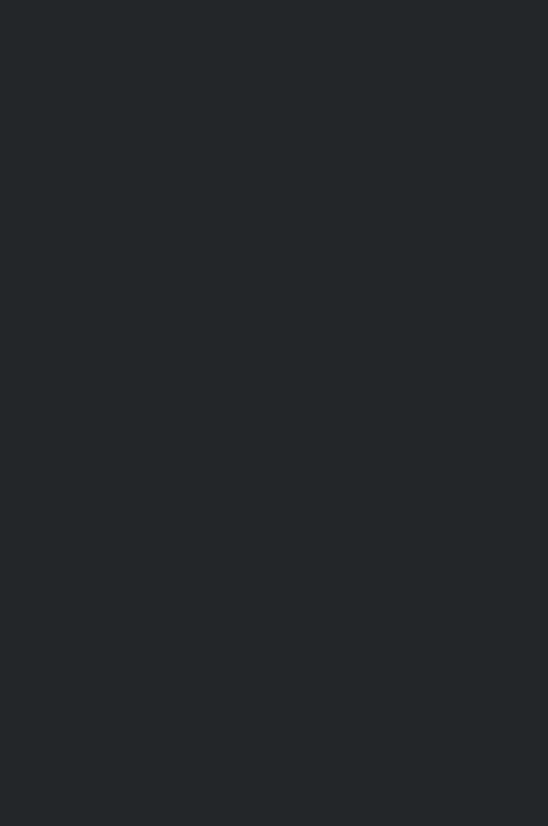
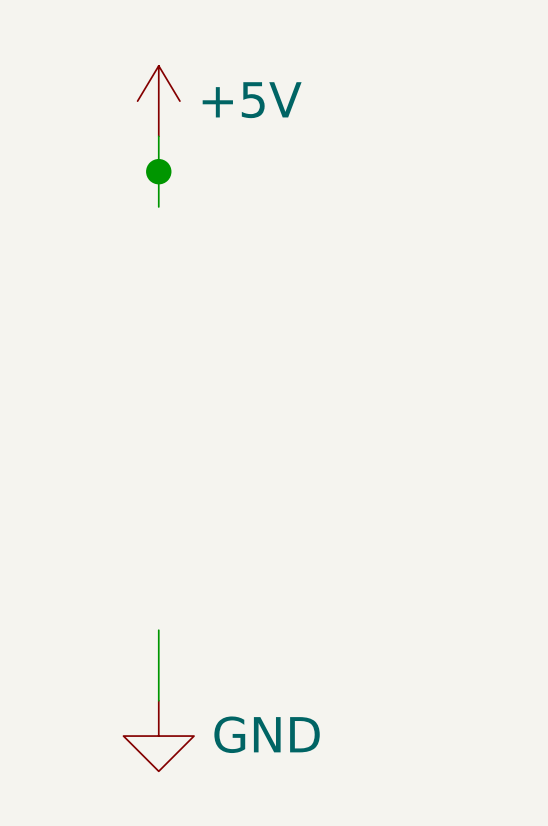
power symbol: none -> +5V (158, 101)
wire: none -> (158, 136) (158, 206)
junction: none -> (158, 171)
wire: none -> (158, 630) (158, 700)
power symbol: none -> GND (158, 736)

